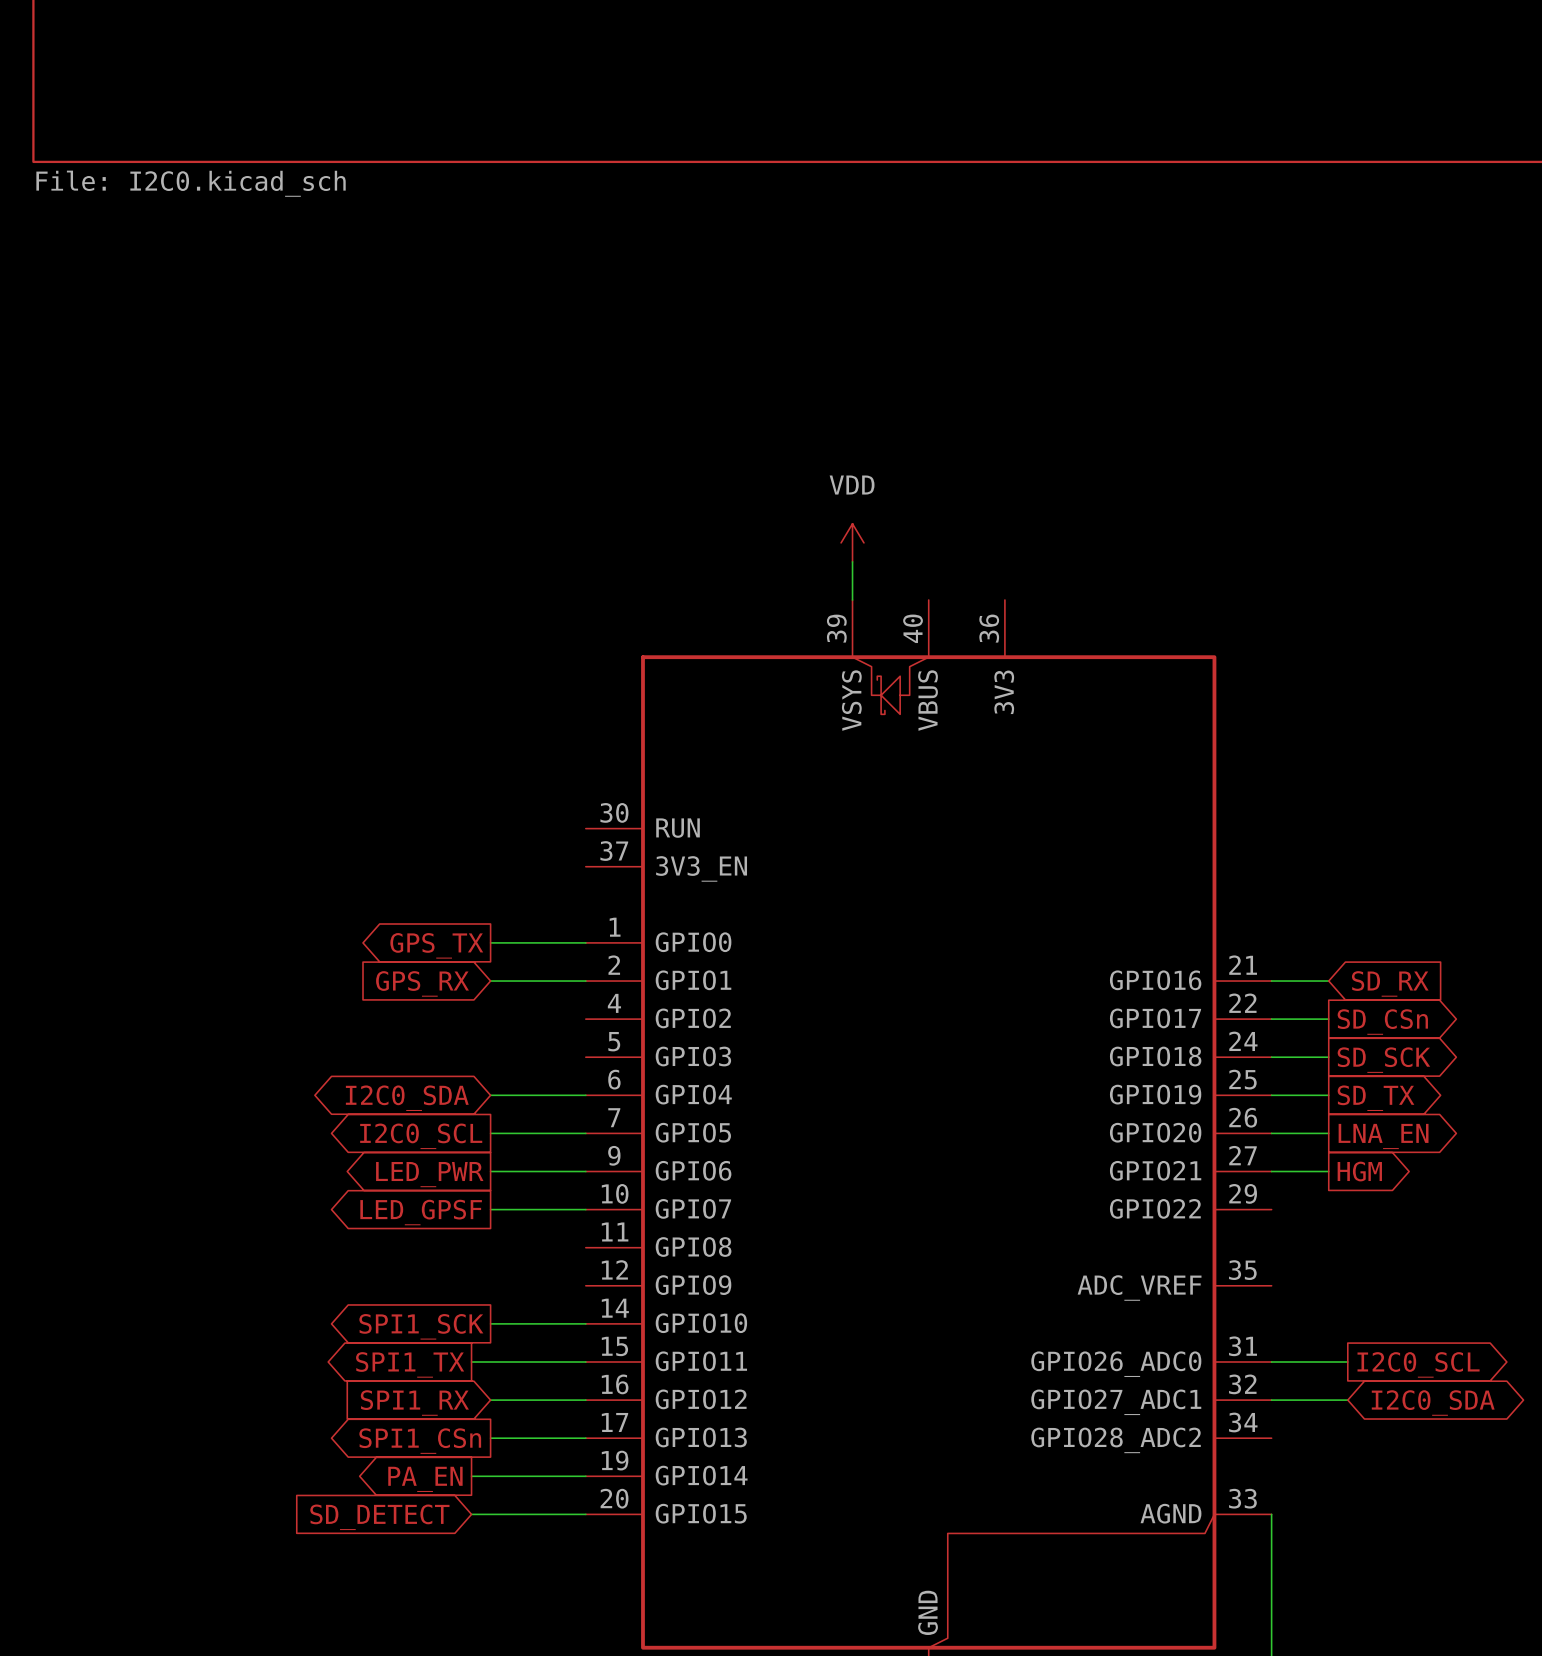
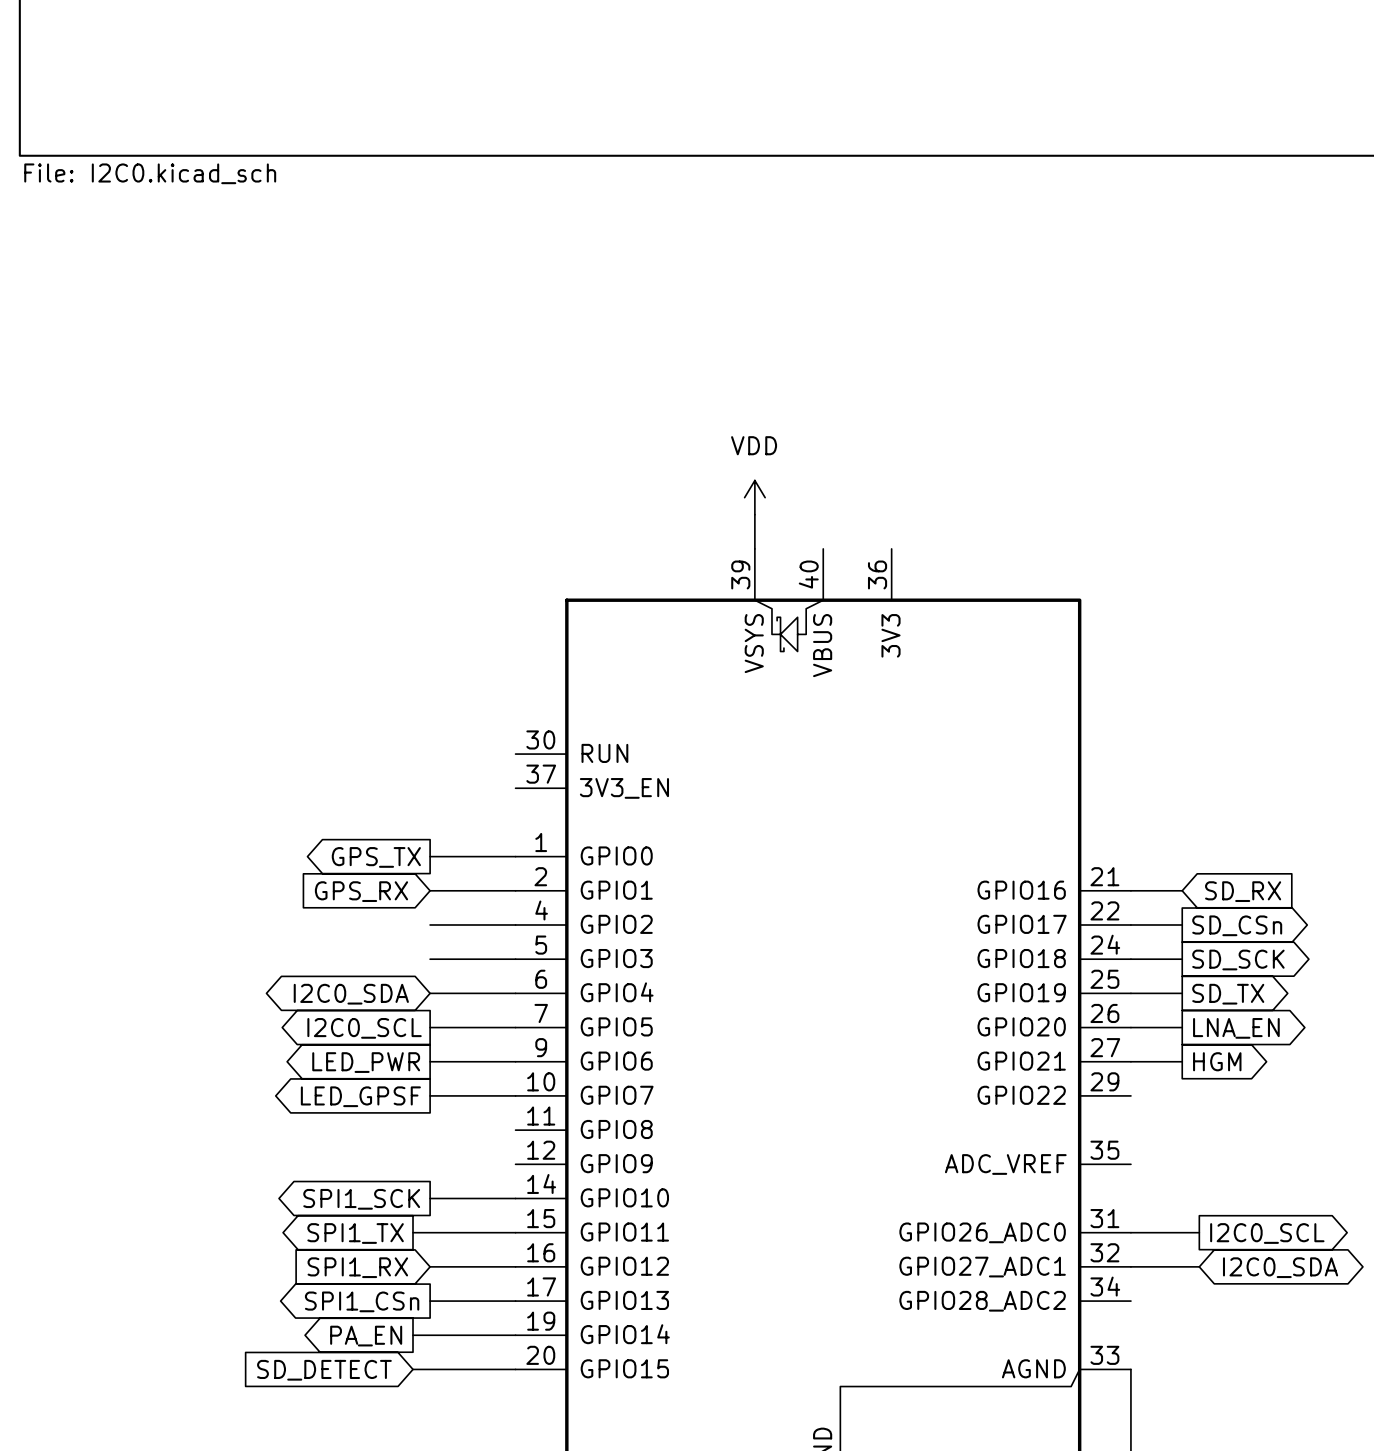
wire: none -> (430, 924) (515, 924)
wire: none -> (430, 959) (515, 959)

